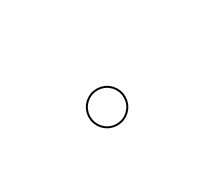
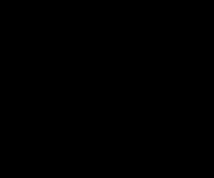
round board edge: [86, 86, 128, 128] -> none

